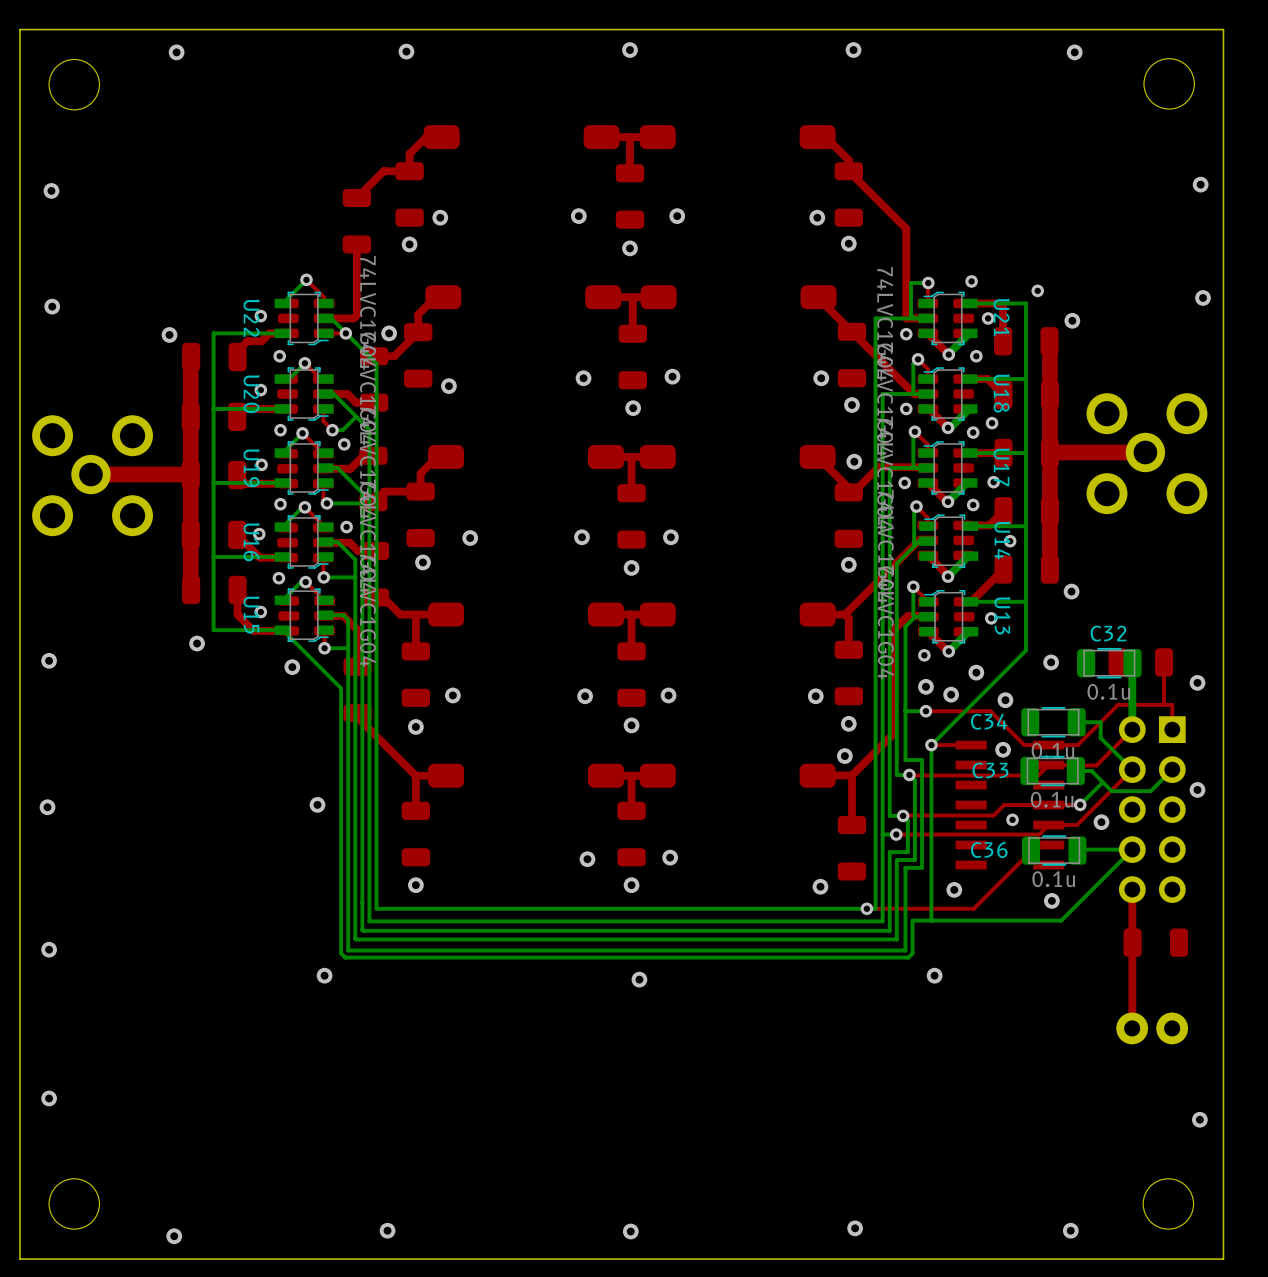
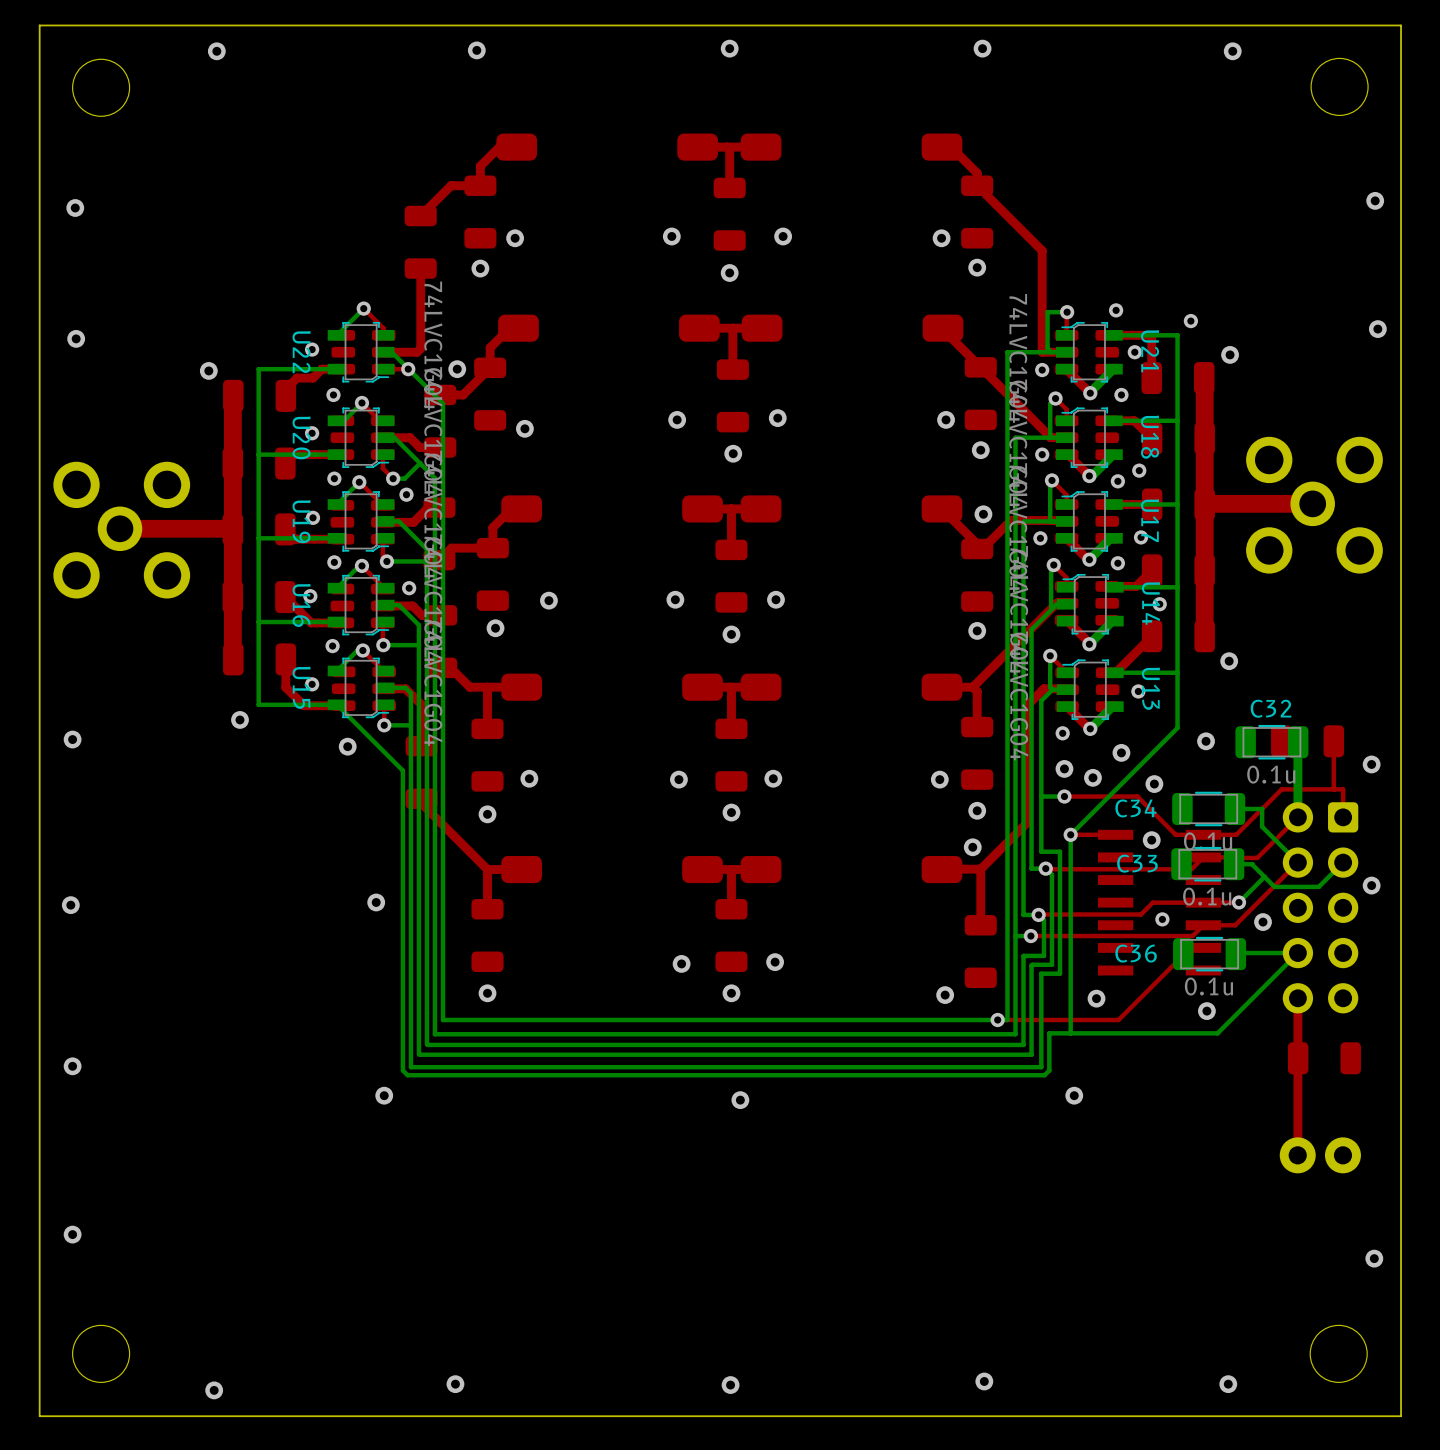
part footprint: [1118, 716, 1186, 903] -> [1282, 802, 1359, 1014]

